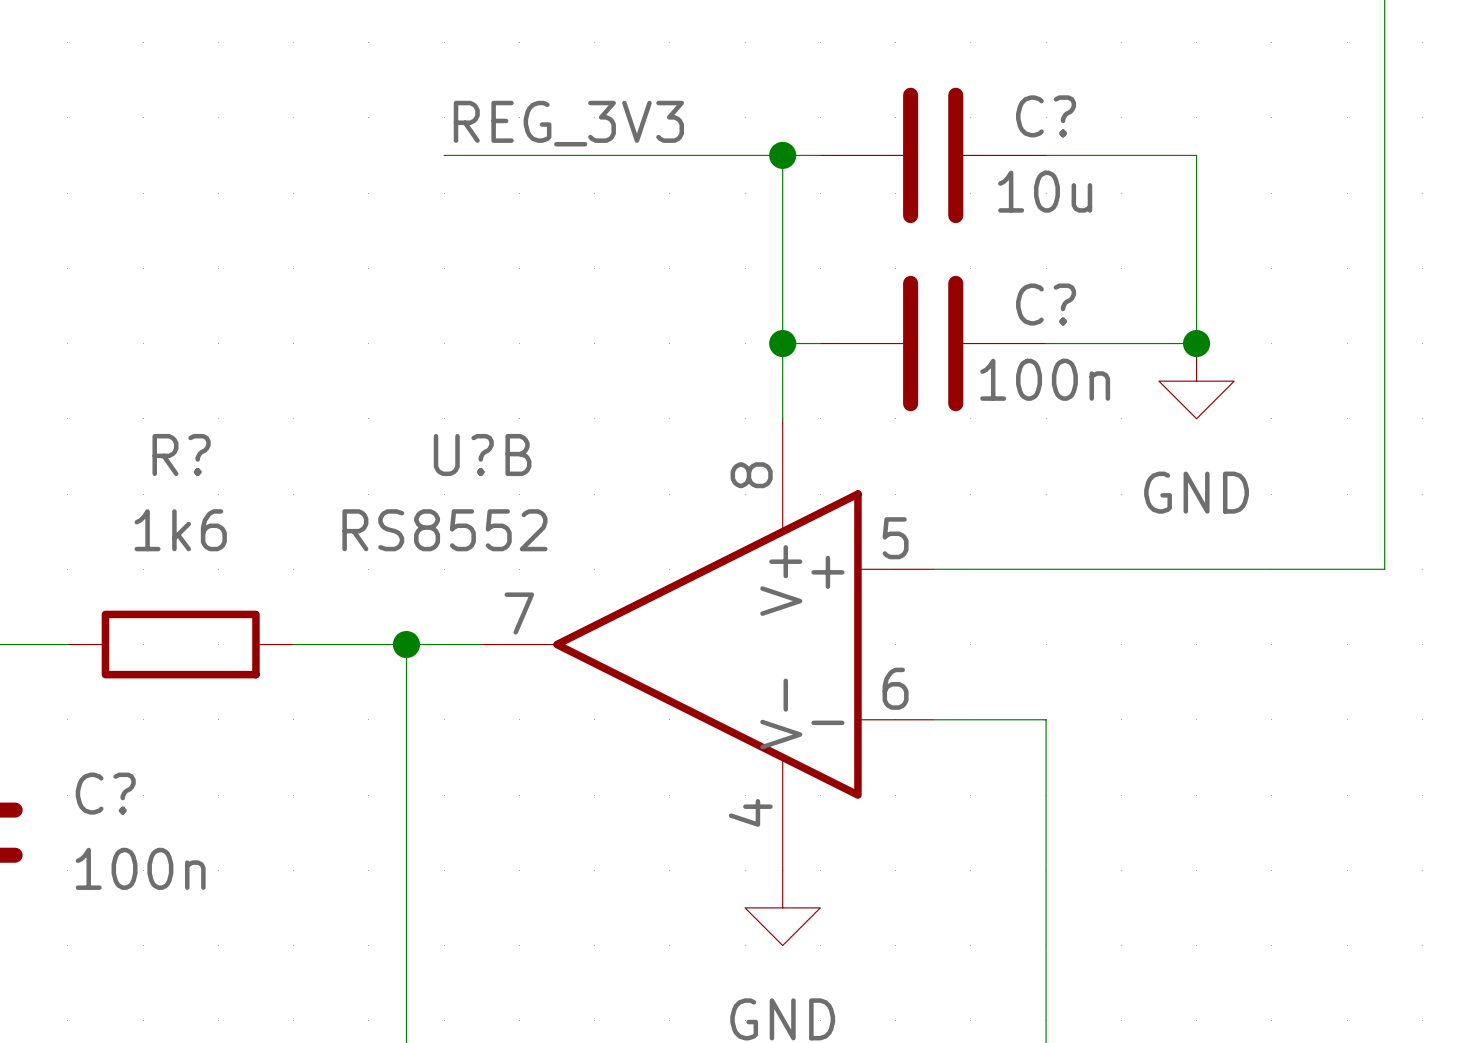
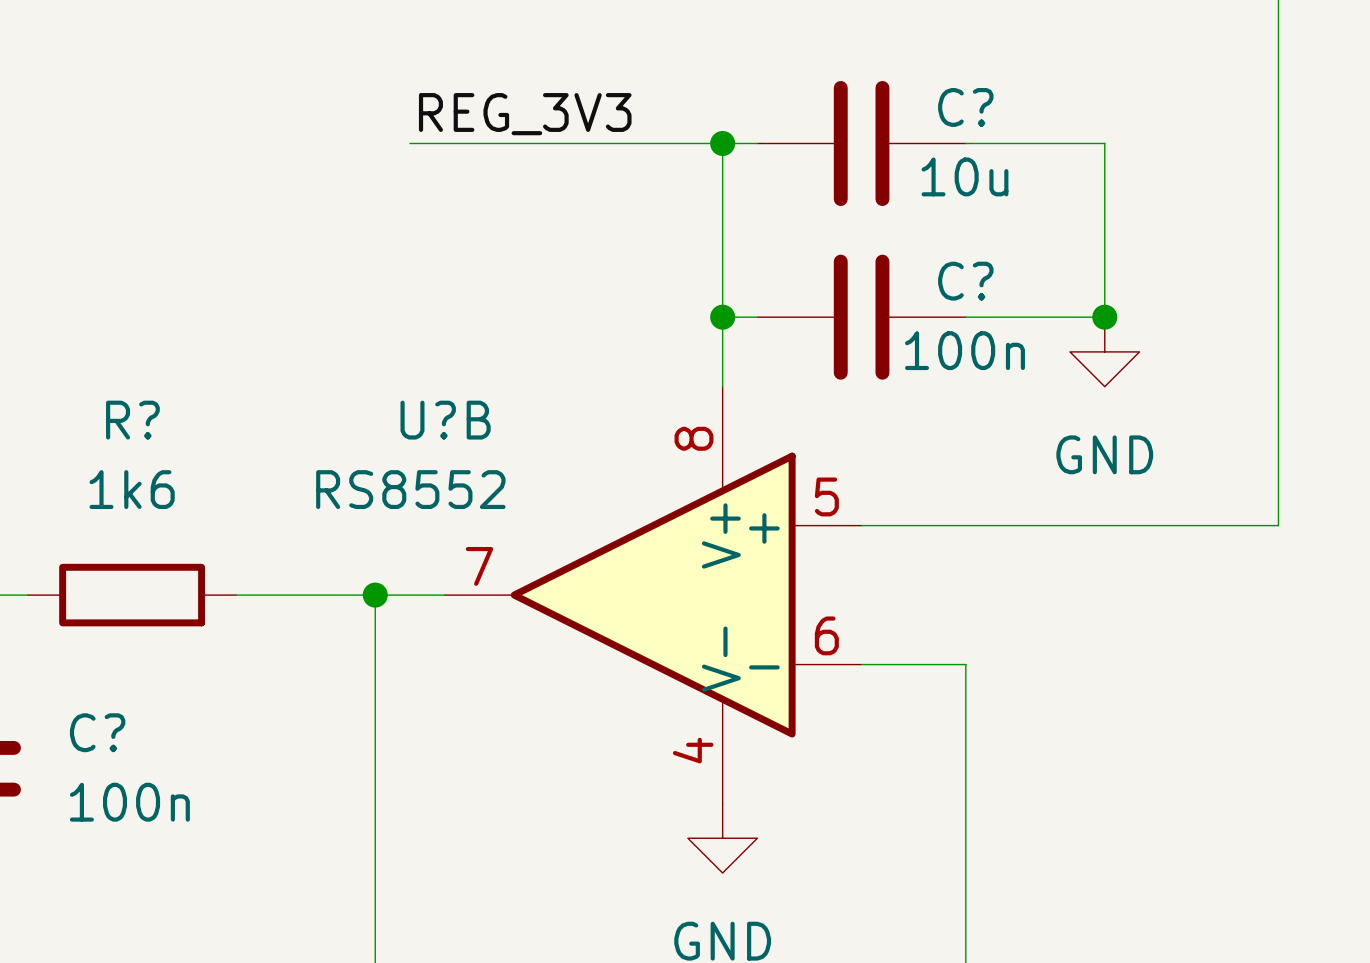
R? position: (180, 644) -> (132, 595)

